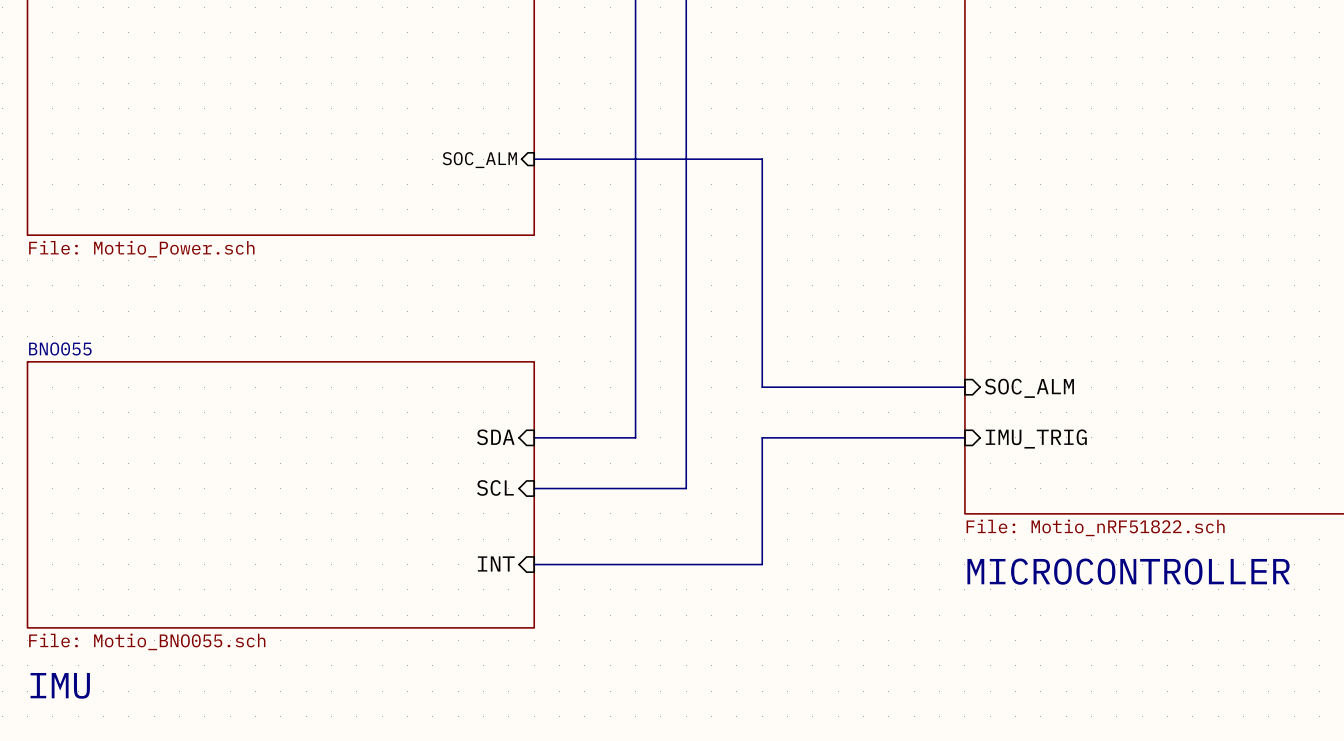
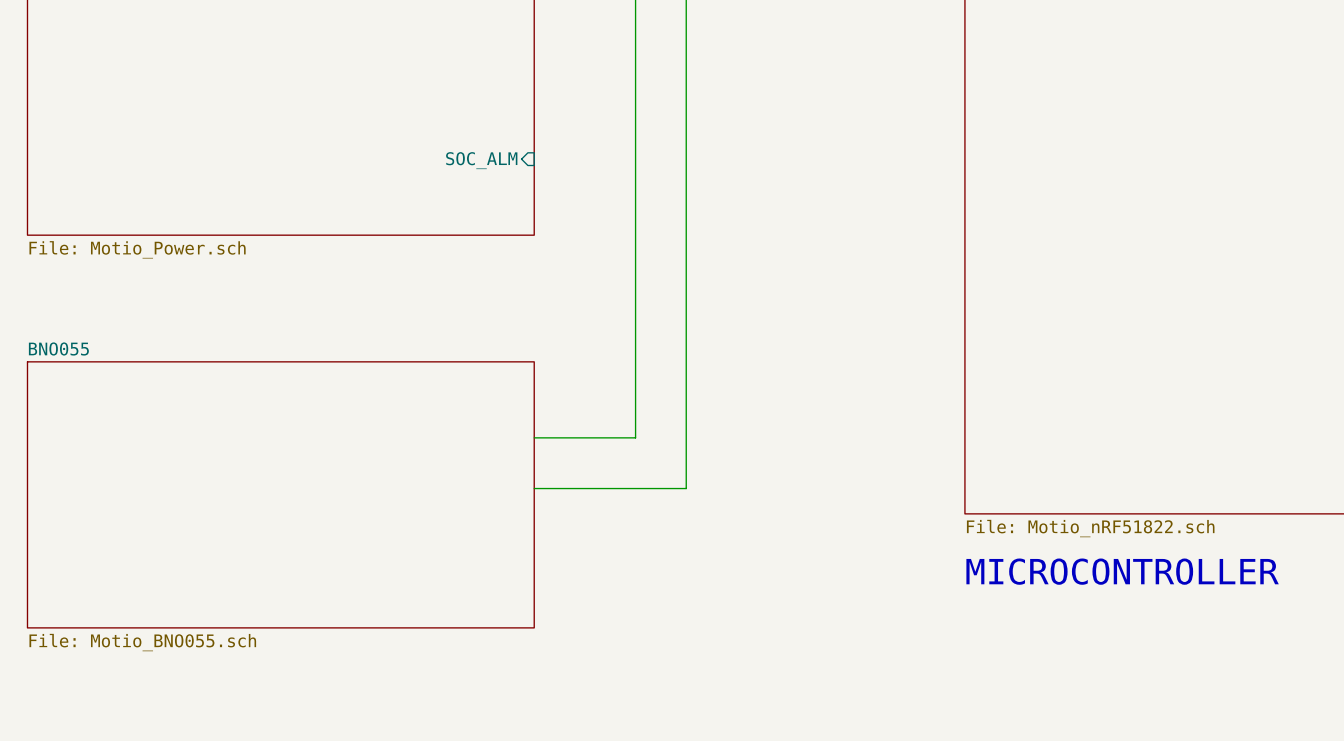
wire: (534, 159) (762, 159) (762, 387) (964, 387) -> none
sheet pin: SOC_ALM (1029, 388) -> none
sheet pin: SDA (495, 437) -> none
wire: (964, 437) (762, 437) (762, 564) (534, 564) -> none
sheet pin: IMU_TRIG (1036, 439) -> none
sheet pin: SCL (495, 487) -> none
sheet pin: INT (496, 563) -> none
text: IMU (60, 685) -> none

